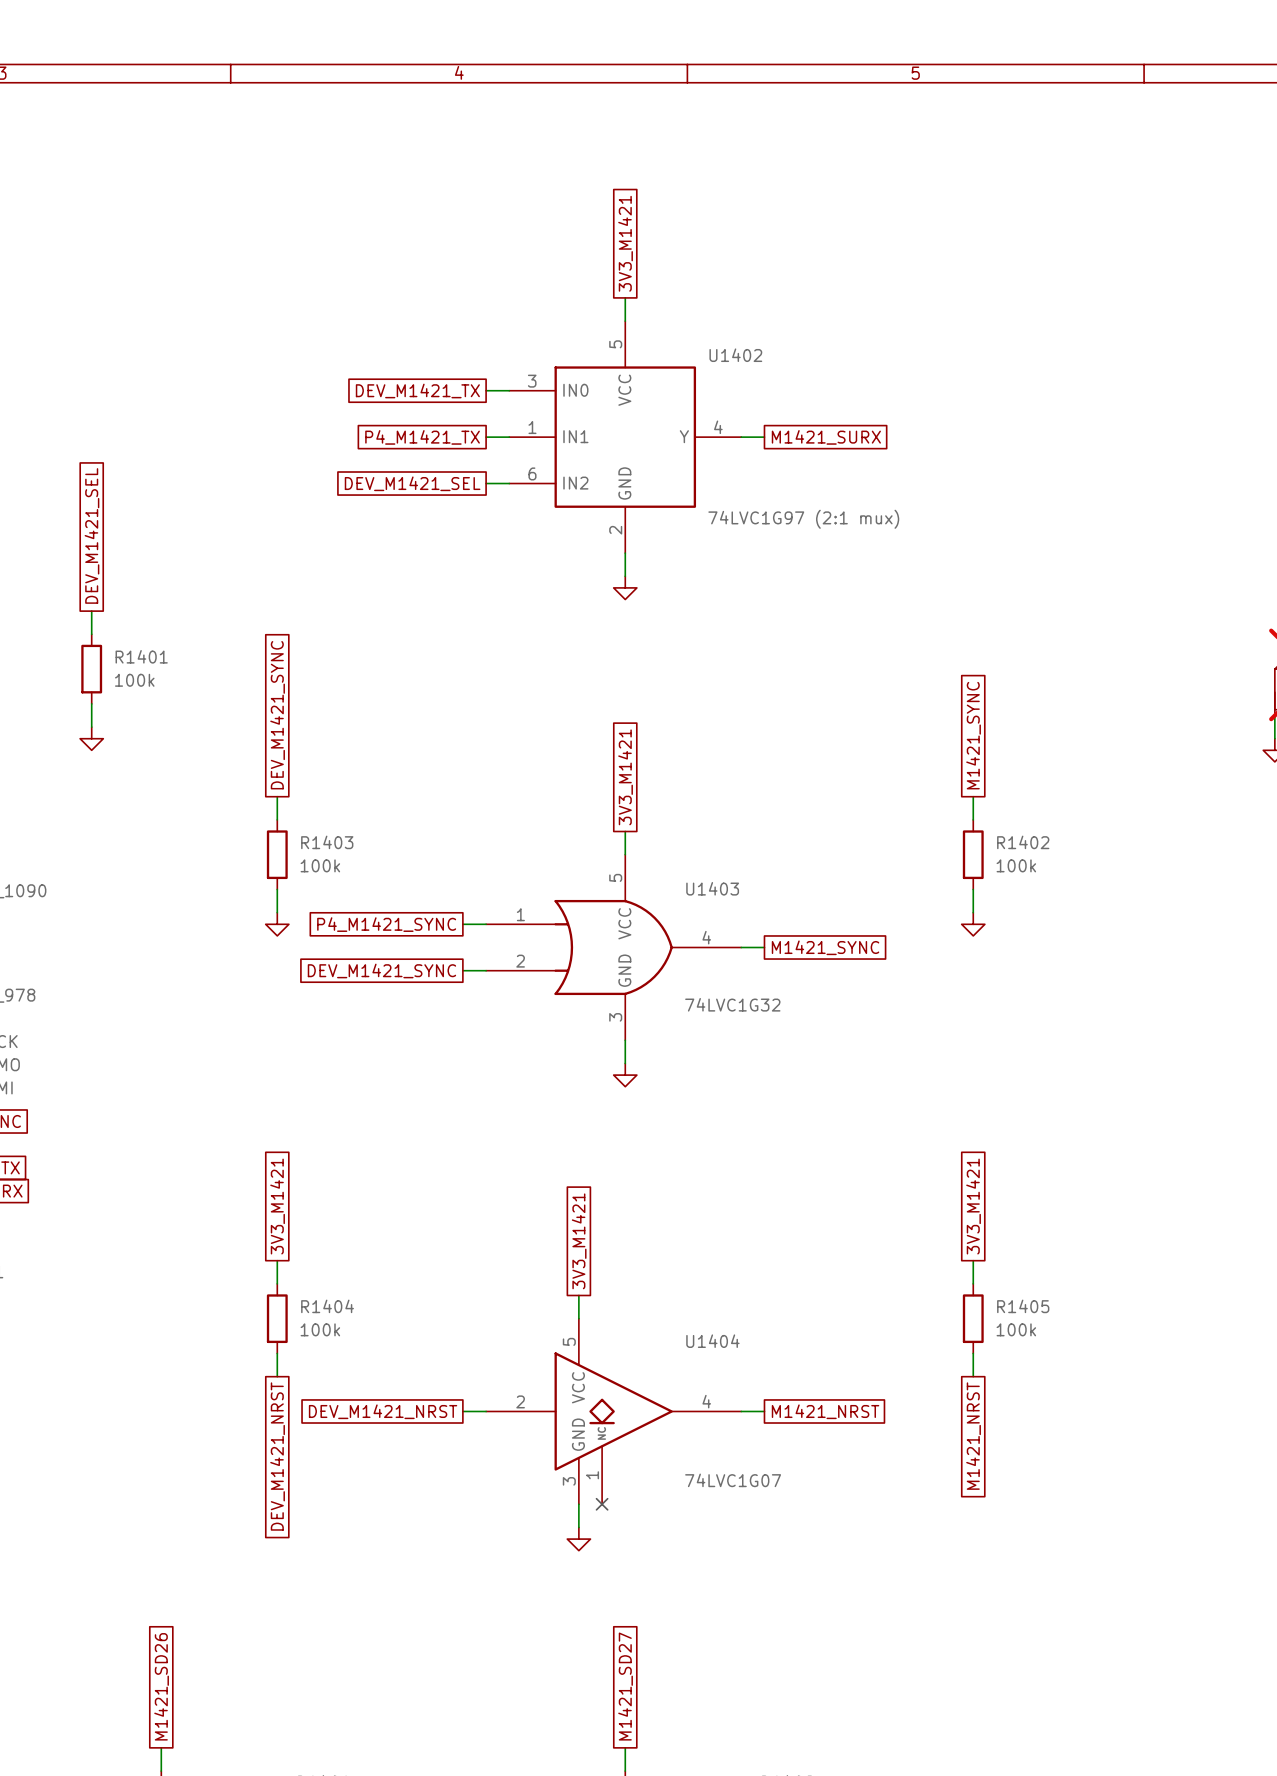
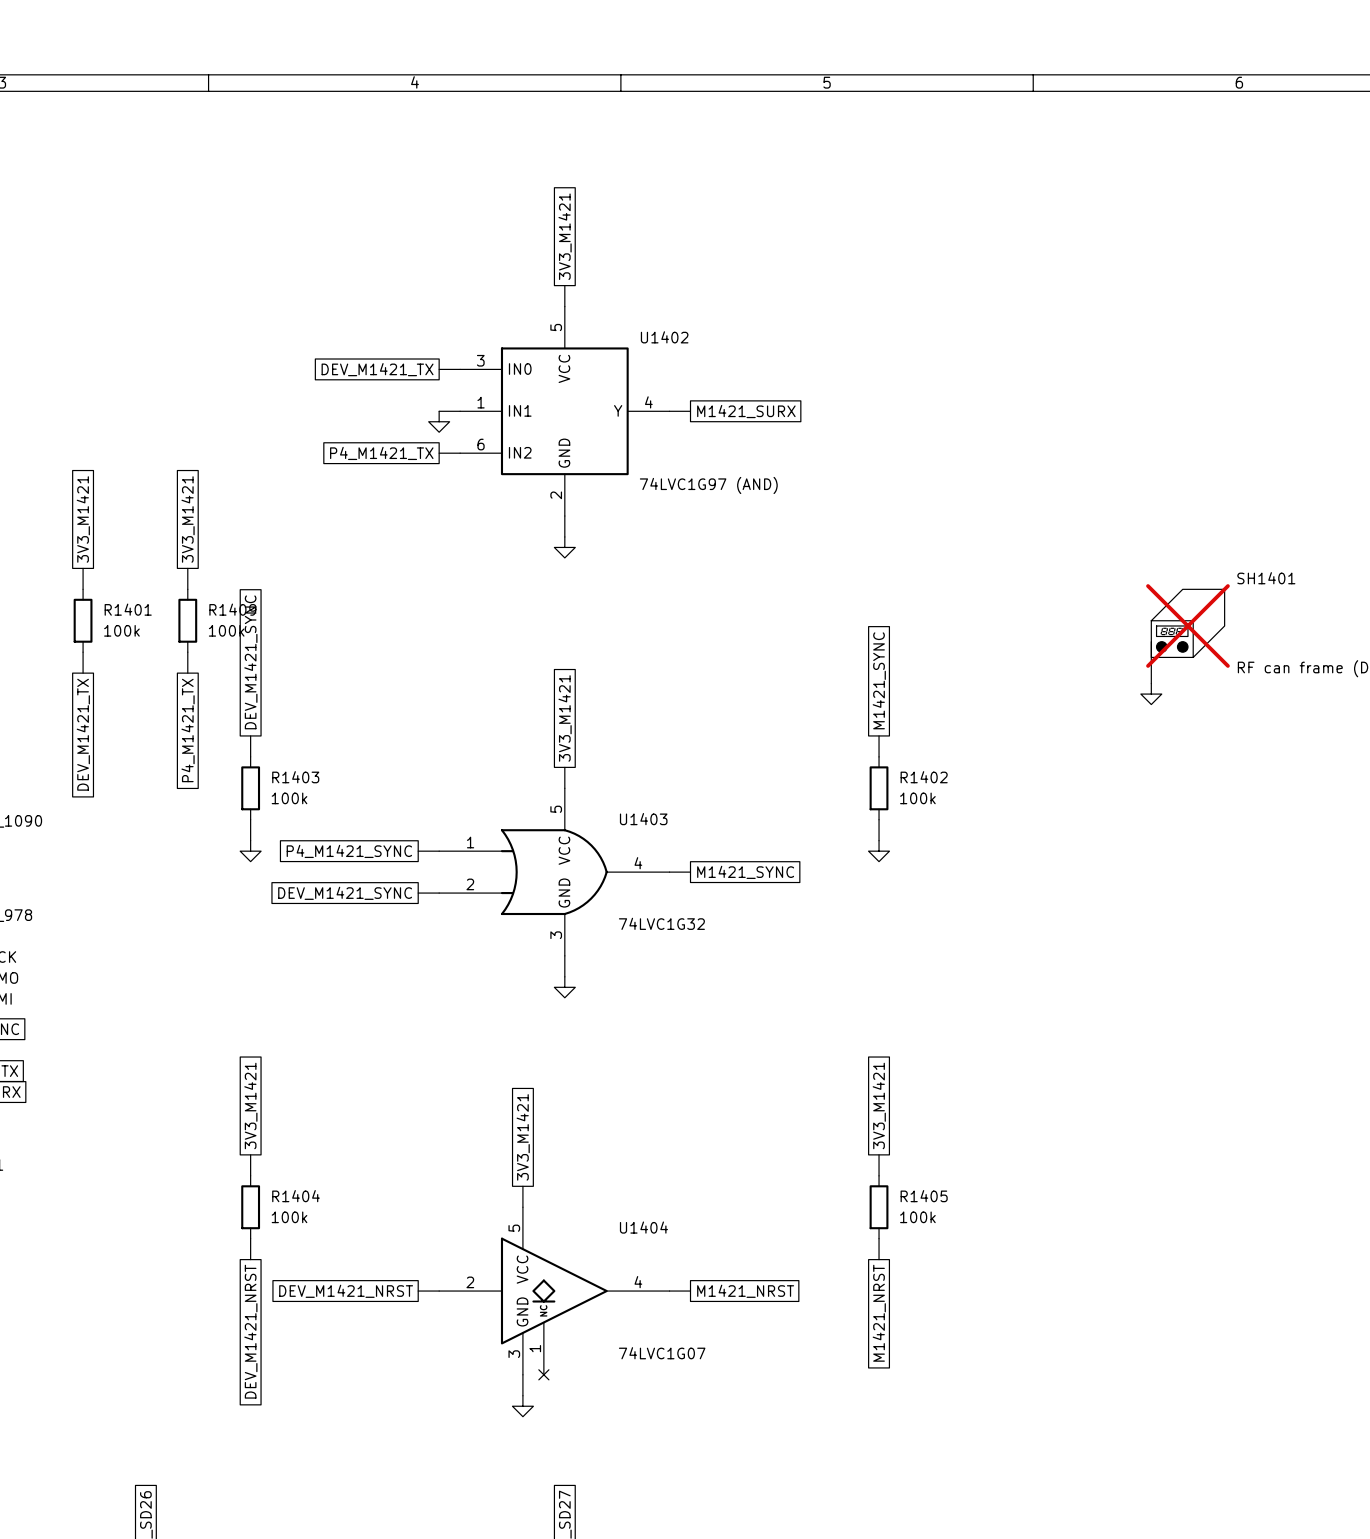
global label: P4_M1421_TX (422, 437) -> none
power symbol: none -> (439, 421)
global label: DEV_M1421_SEL (412, 483) -> P4_M1421_TX (381, 453)
U1402 value: 74LVC1G97 (2:1 mux) (803, 519) -> 74LVC1G97 (AND) (708, 485)
global label: DEV_M1421_SEL (91, 535) -> 3V3_M1421 (83, 519)
global label: none -> 3V3_M1421 (188, 519)
wire: none -> (187, 568) (187, 589)
R1409: none -> 100k (187, 620)
wire: none -> (187, 652) (187, 673)
power symbol: (91, 738) -> none
global label: none -> P4_M1421_TX (188, 730)
global label: none -> DEV_M1421_TX (83, 734)

